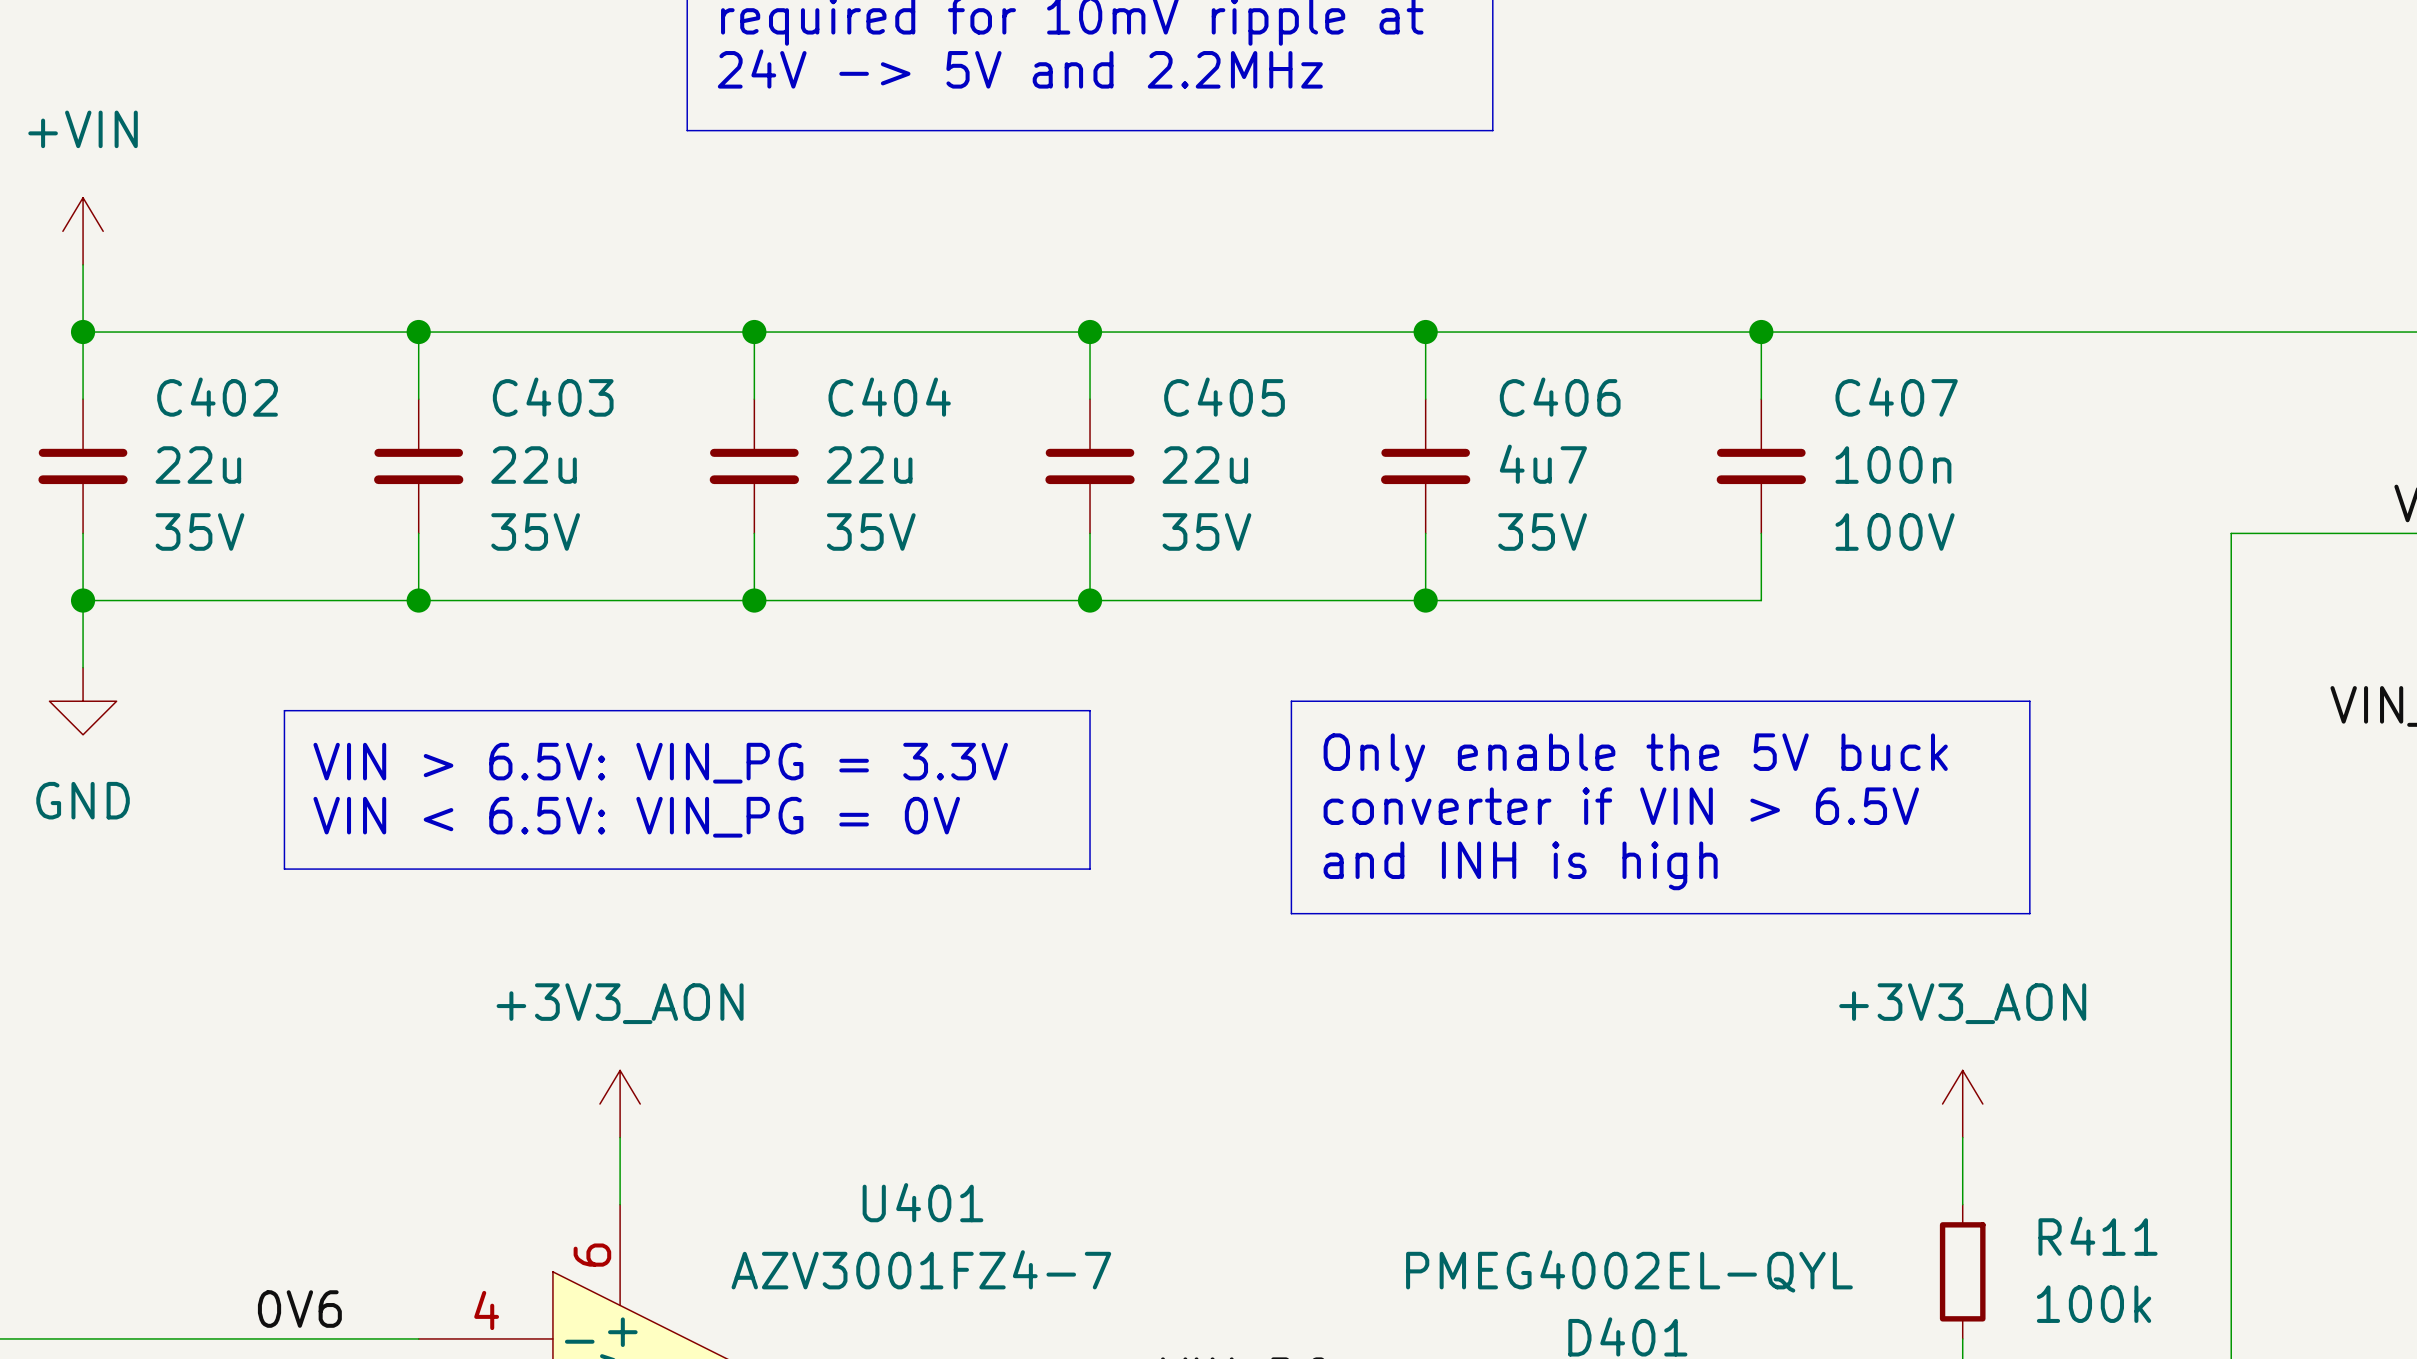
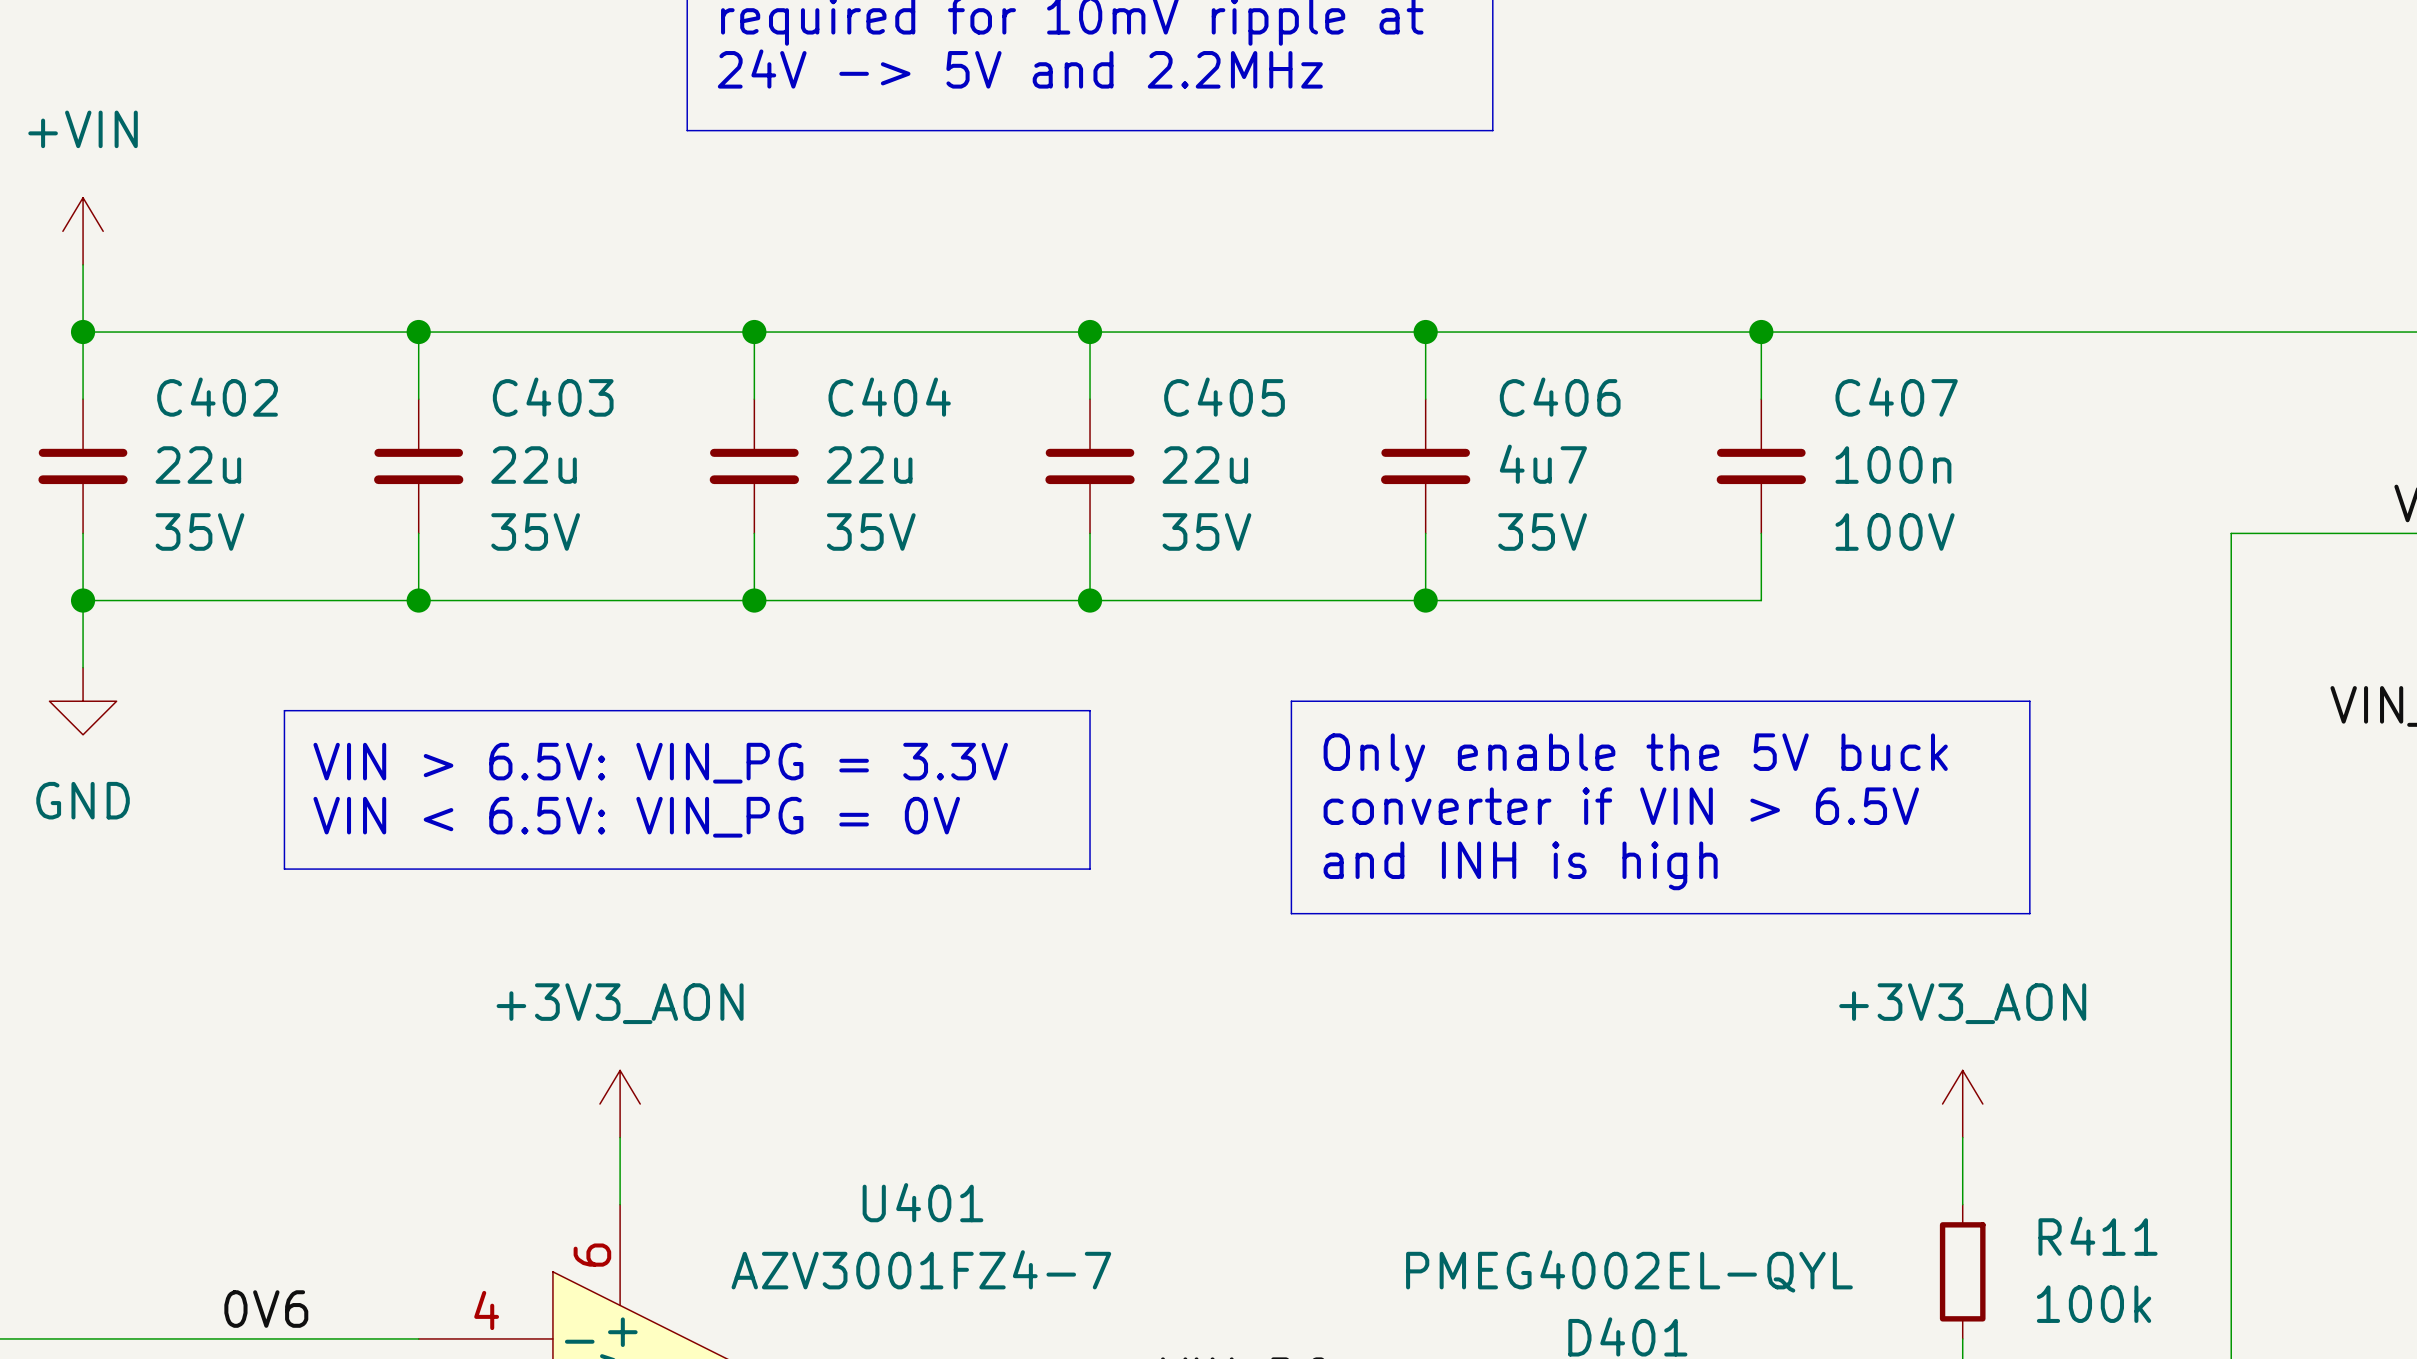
label position: 0V6 (299, 1309) -> 0V6 (266, 1309)

